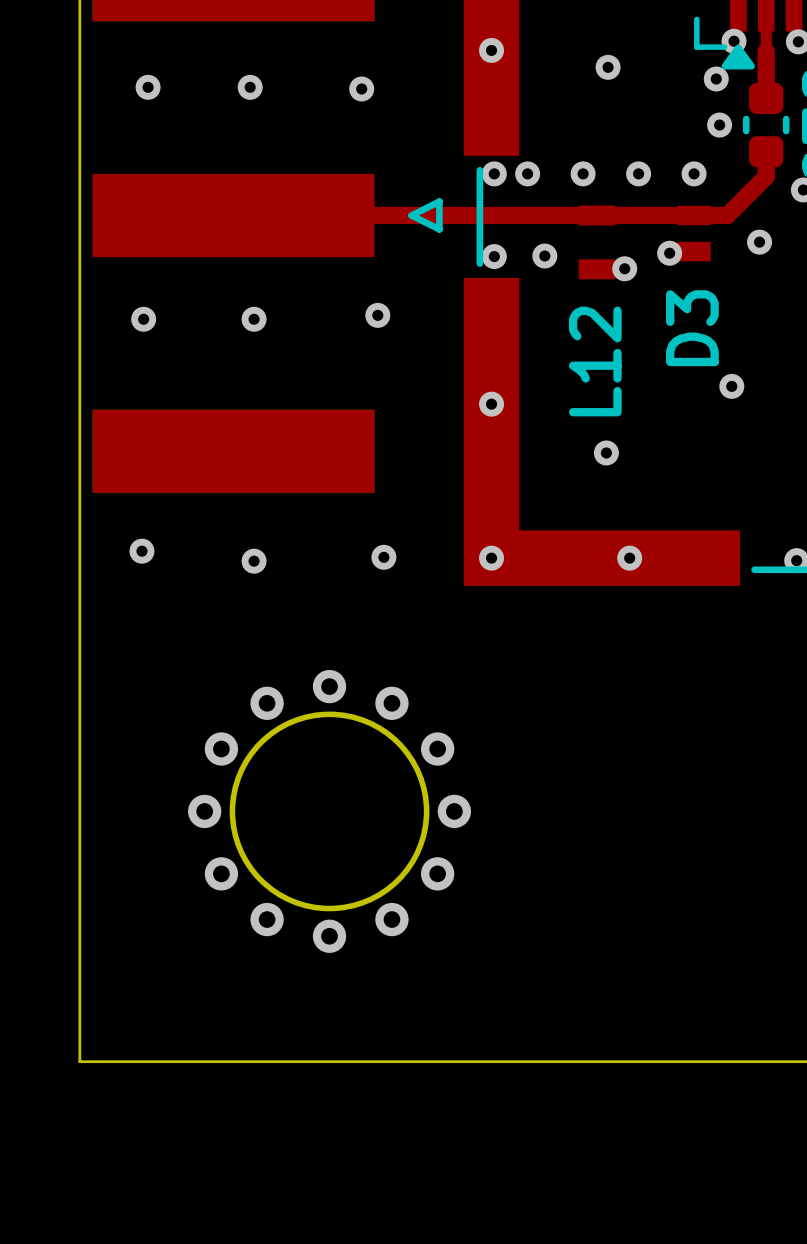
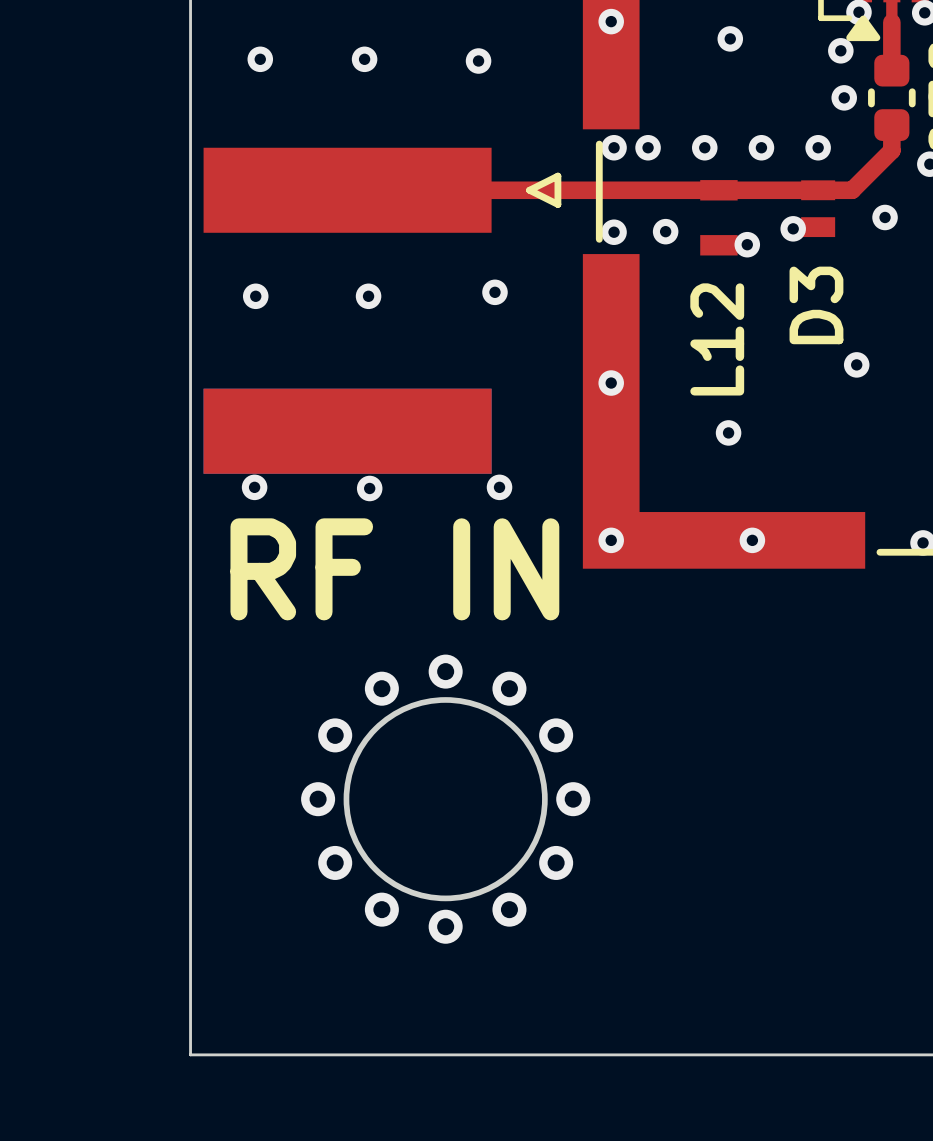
via position: (141, 551) -> (254, 487)
via position: (383, 557) -> (499, 487)
via position: (254, 561) -> (369, 488)
text: none -> RF IN (394, 569)

